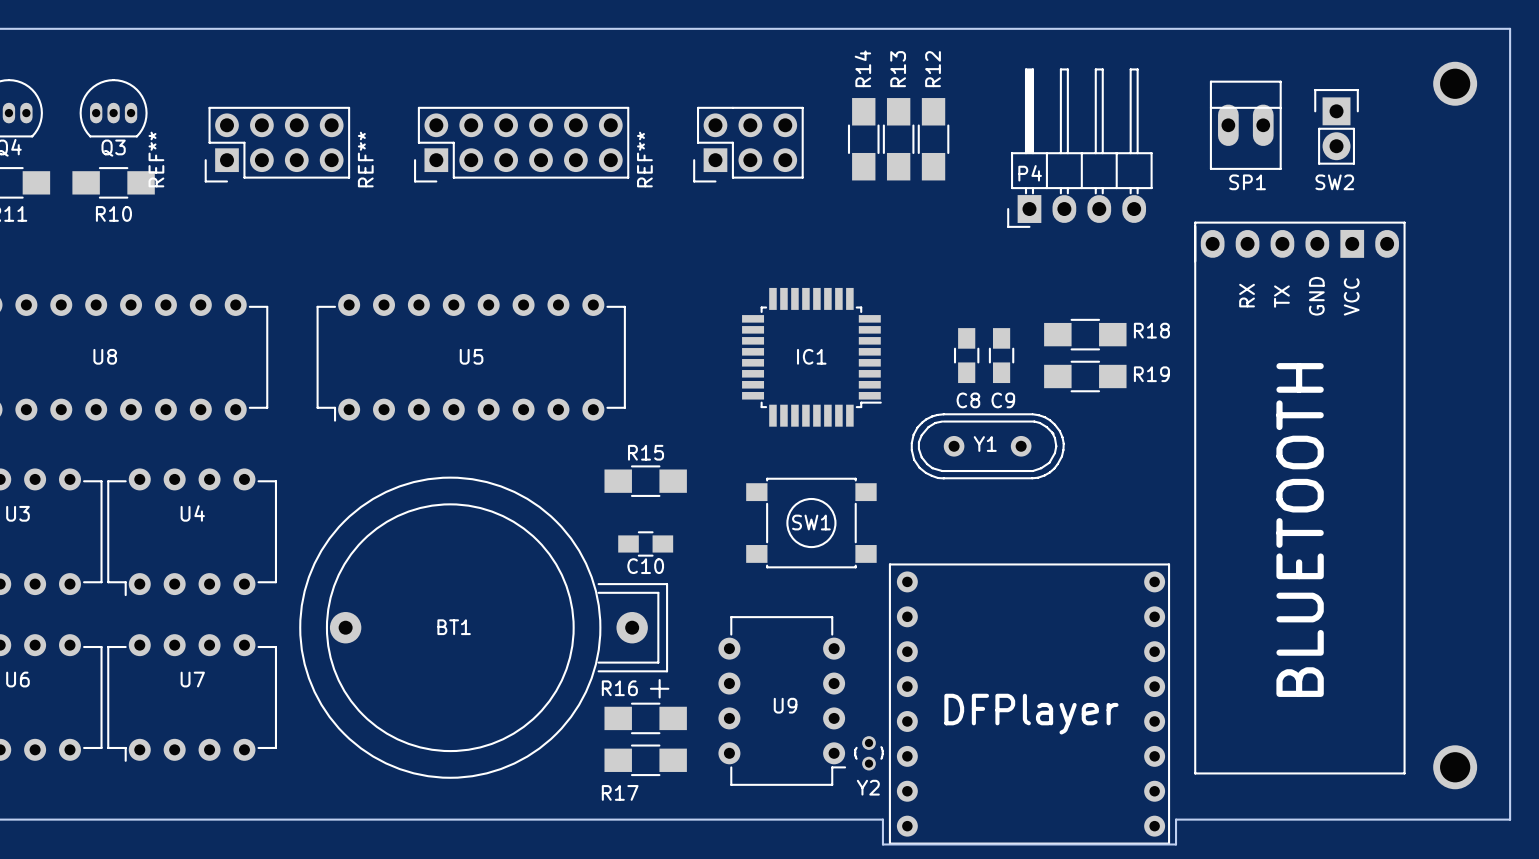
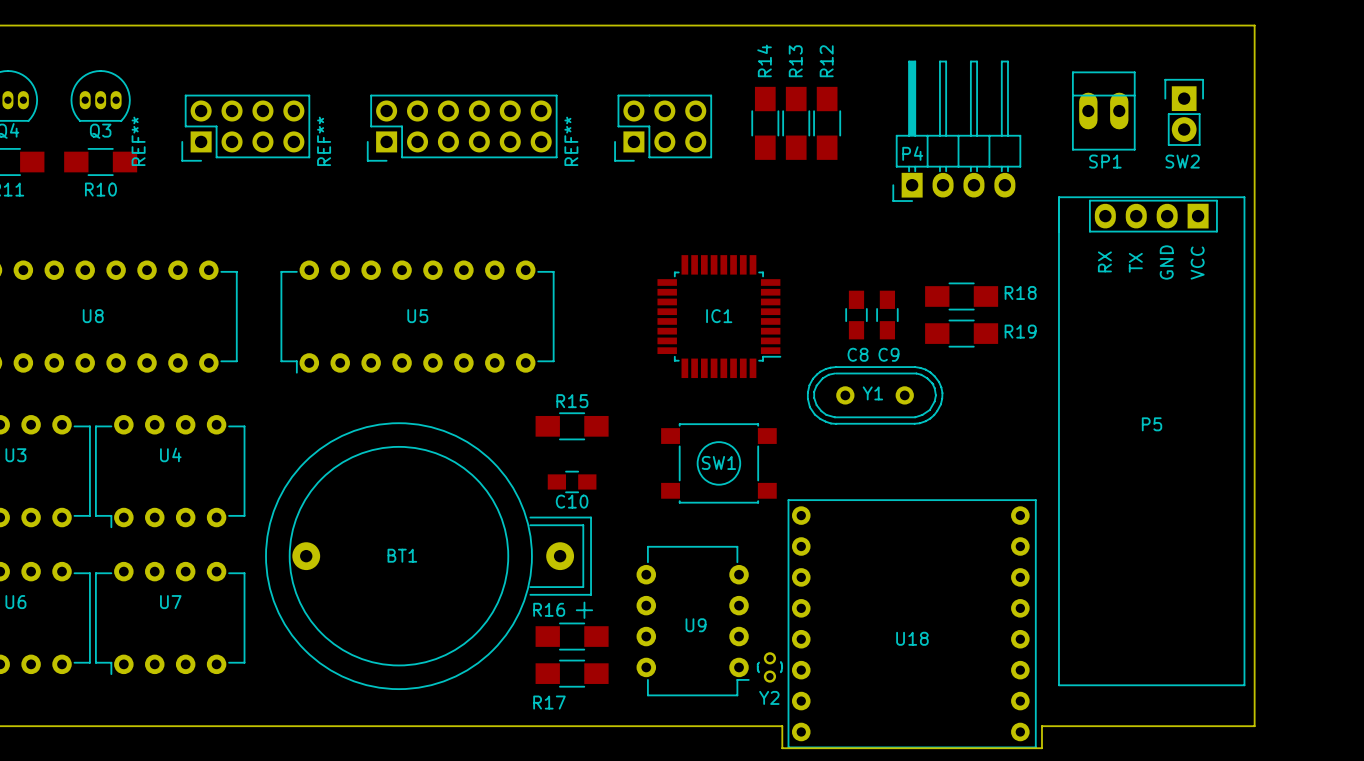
board edge: (1416, 28) (1510, 28) (1510, 819) (1416, 819) -> (1254, 25) (1254, 726)
part: (1455, 83) -> none
BLUETOOTH: (1299, 498) -> none
P5: none -> (1151, 441)
DFPlayer: (1029, 704) -> none
U18: none -> (912, 623)
part: (1455, 767) -> none

